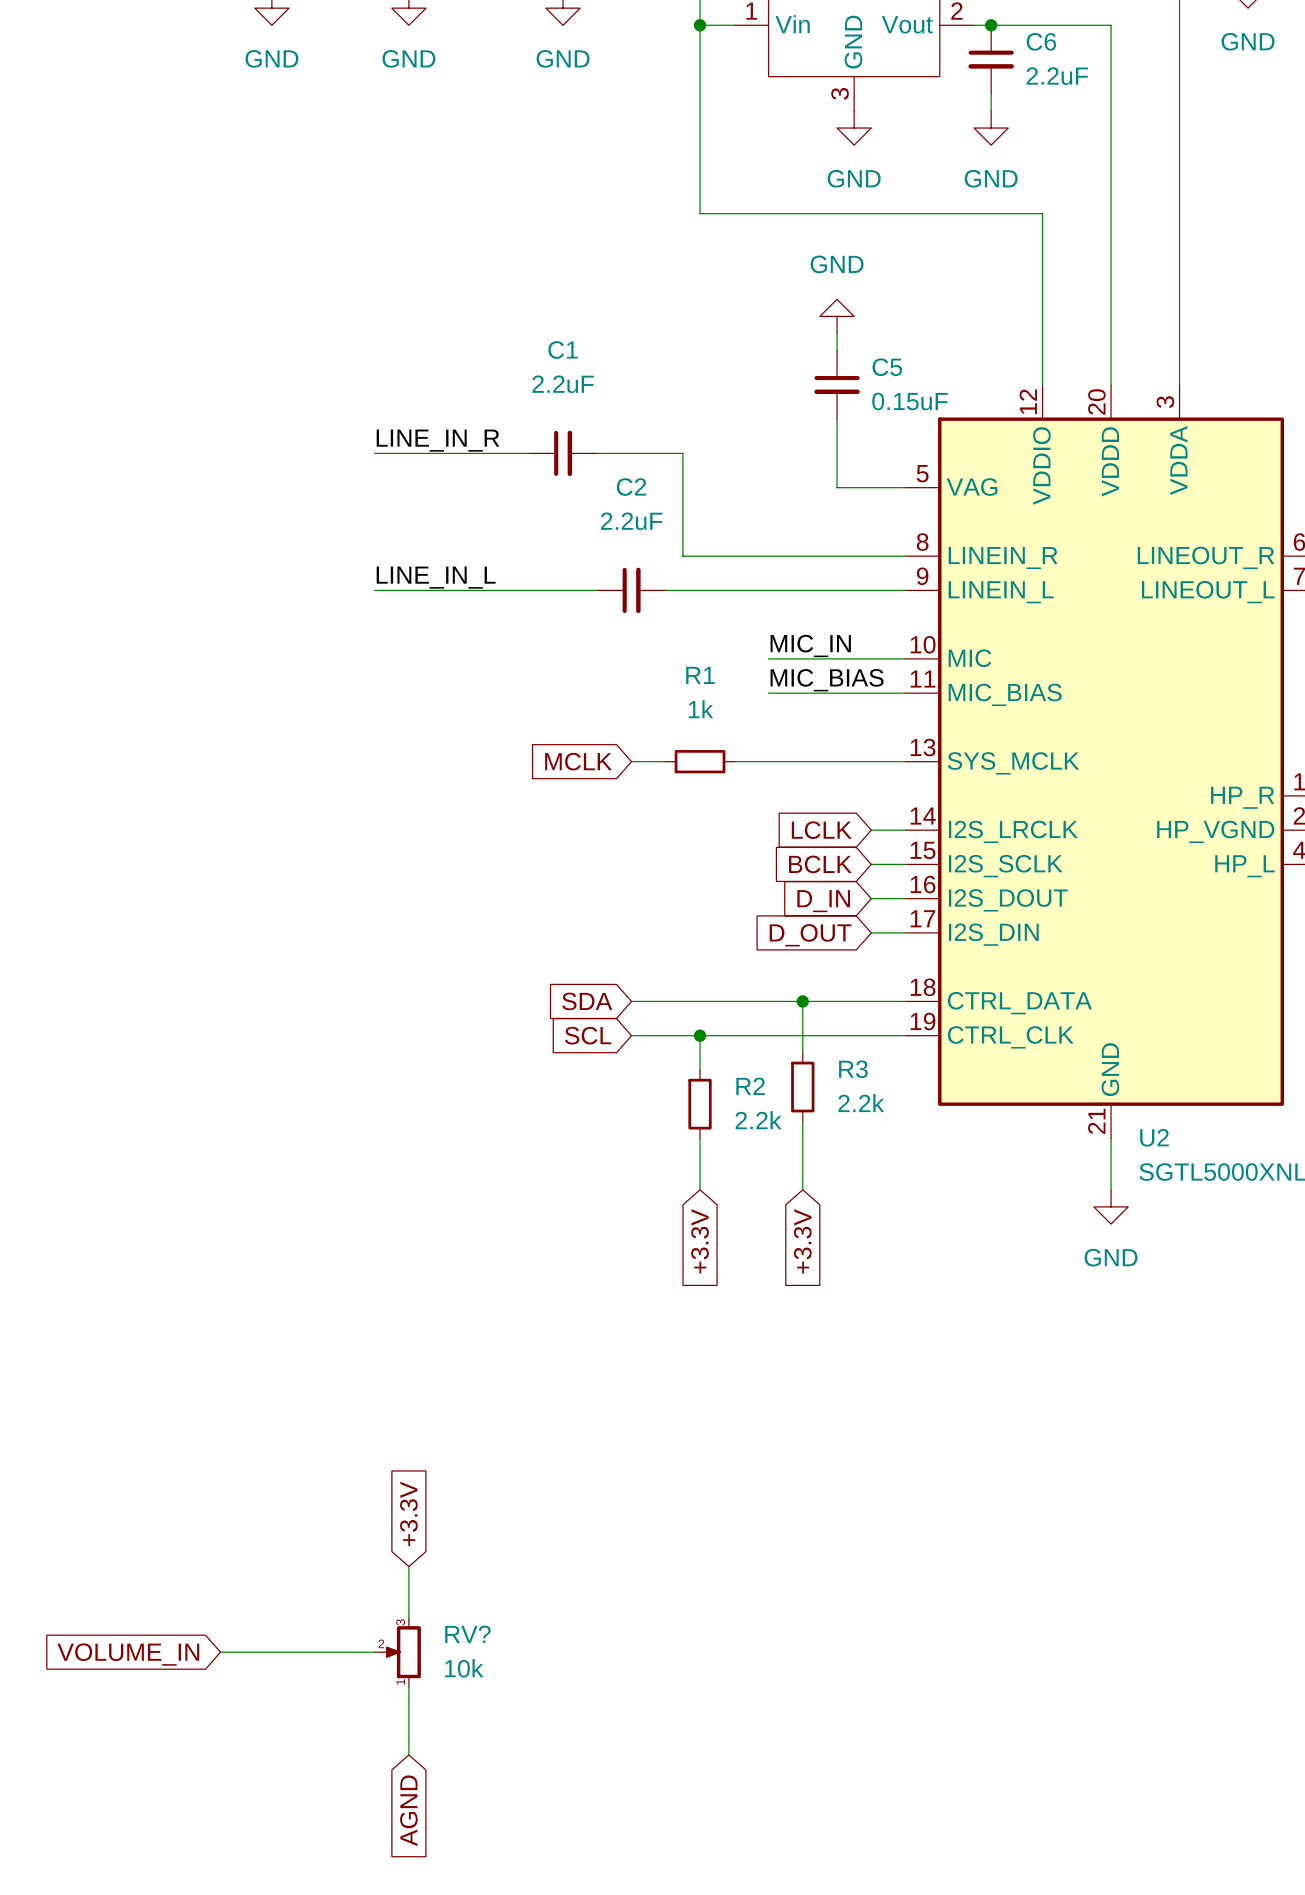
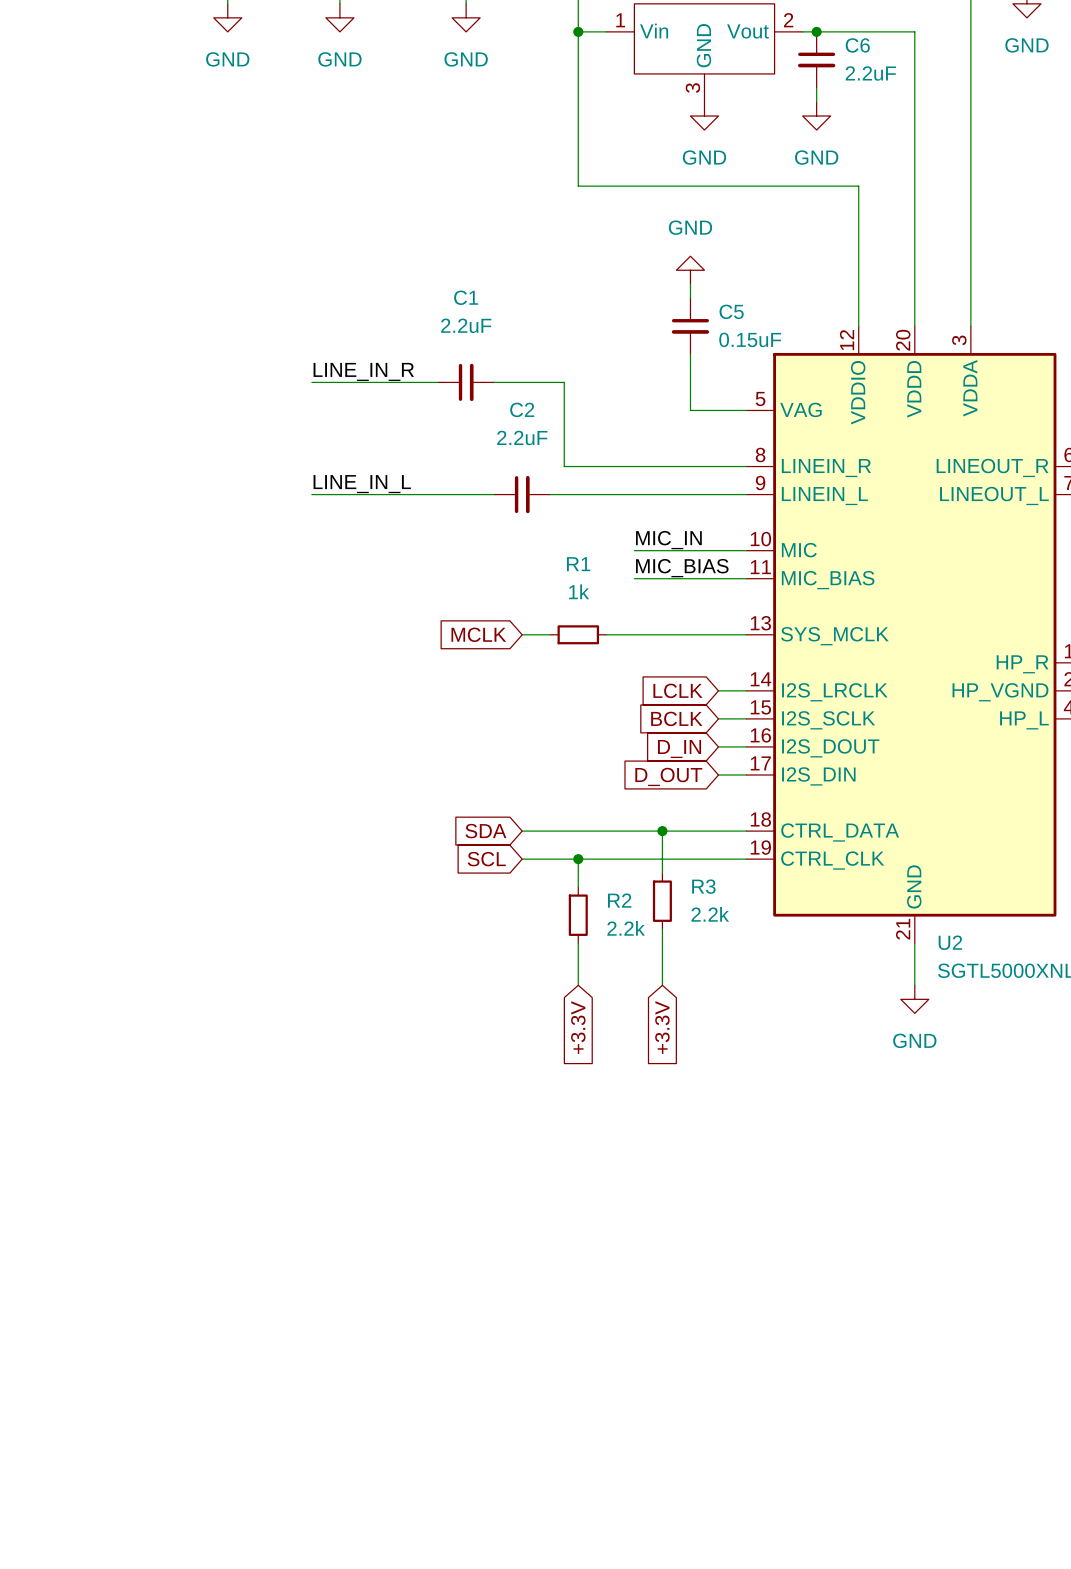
global label: +3.3V (408, 1513) -> none
wire: (408, 1566) (408, 1617) -> none
wire: (220, 1652) (374, 1652) -> none
RV?: 10k (397, 1652) -> none
global label: VOLUME_IN (128, 1654) -> none
wire: (408, 1686) (408, 1754) -> none
global label: AGND (408, 1810) -> none

